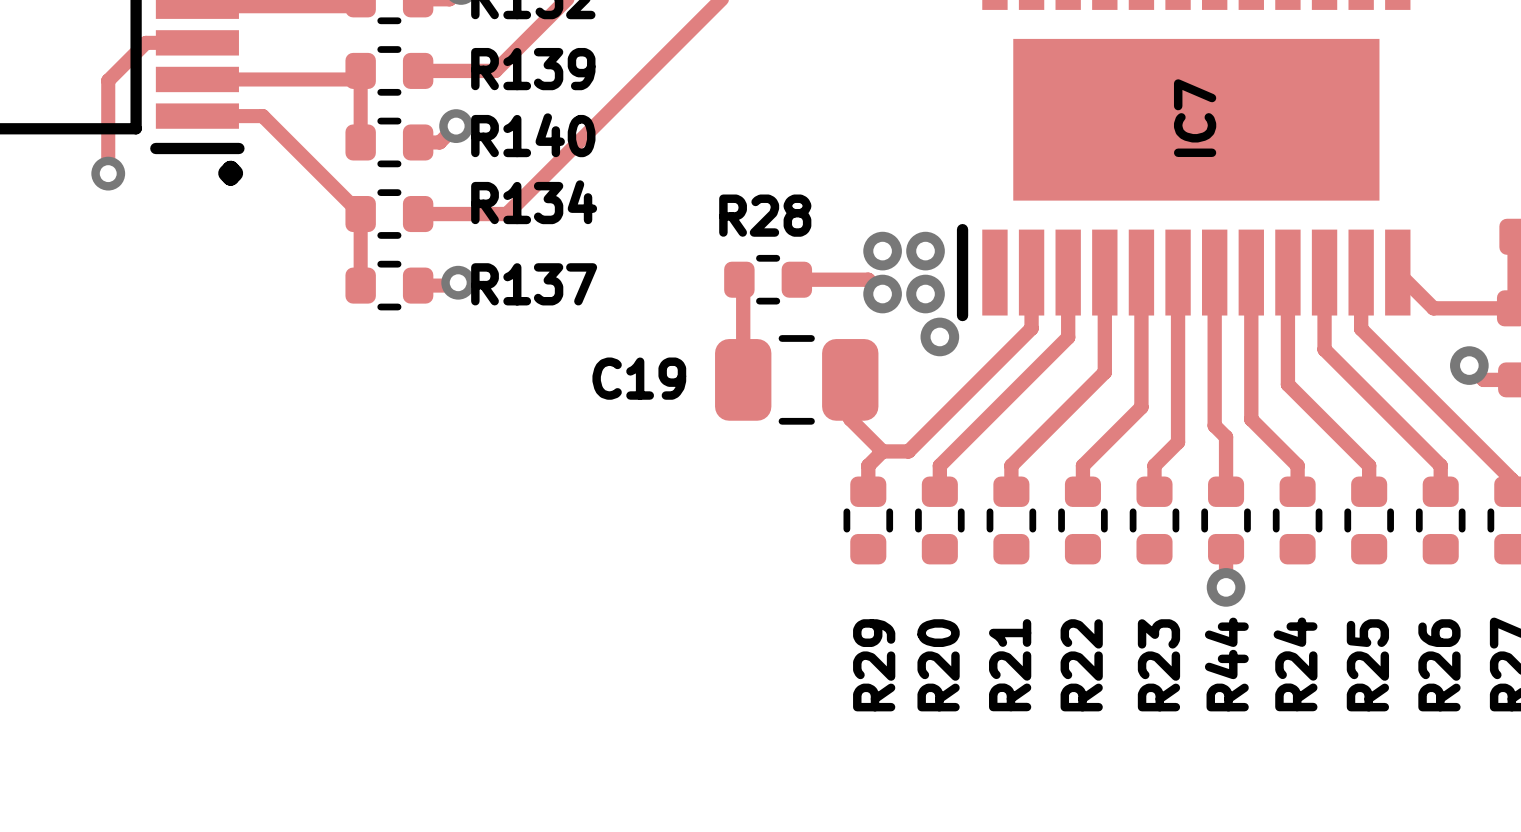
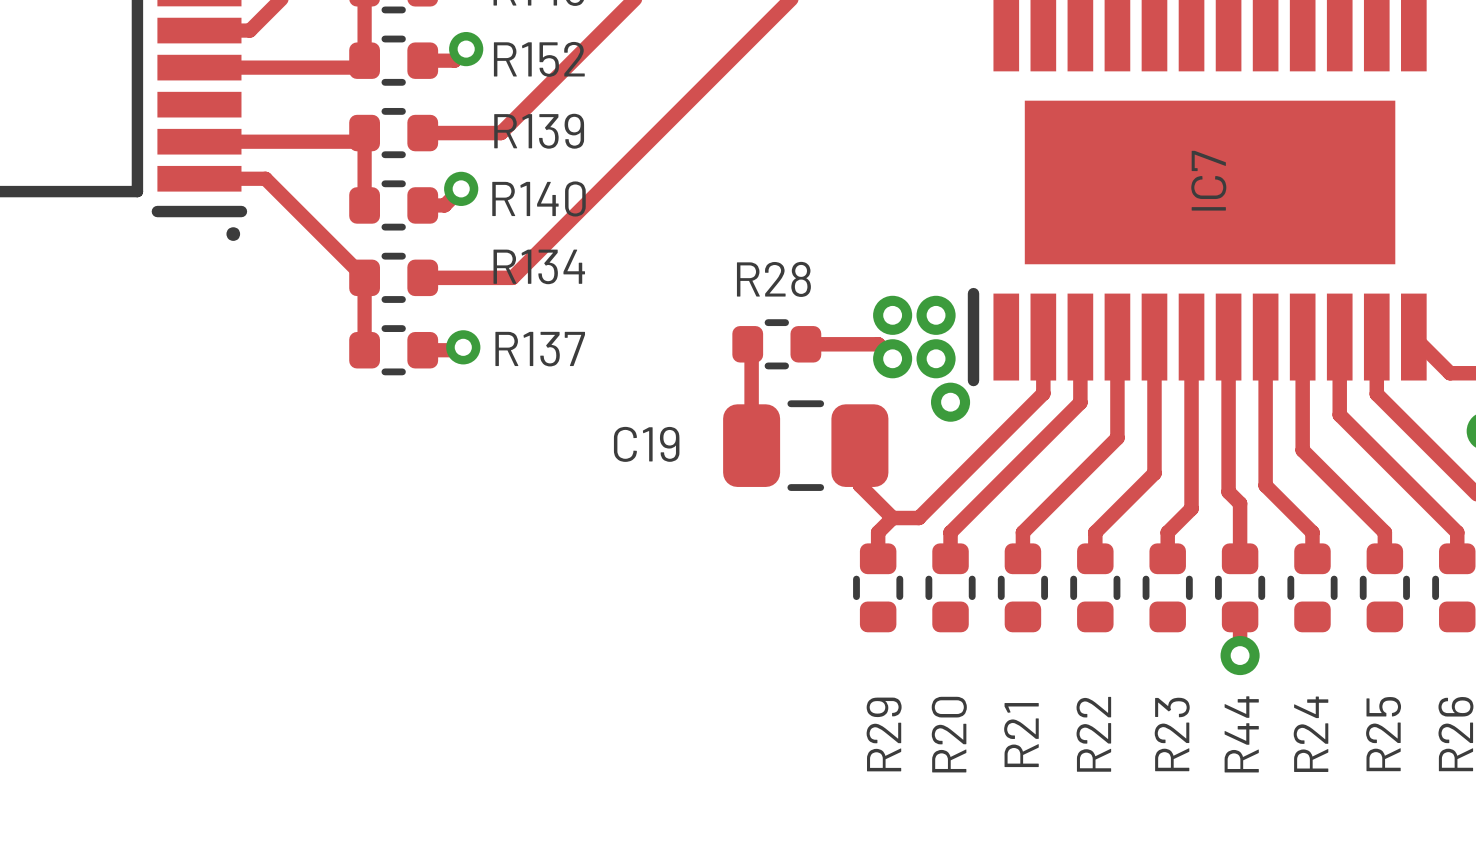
track: (197, 42) (146, 42) (108, 80) (108, 173) -> none
via: (108, 173) -> none

